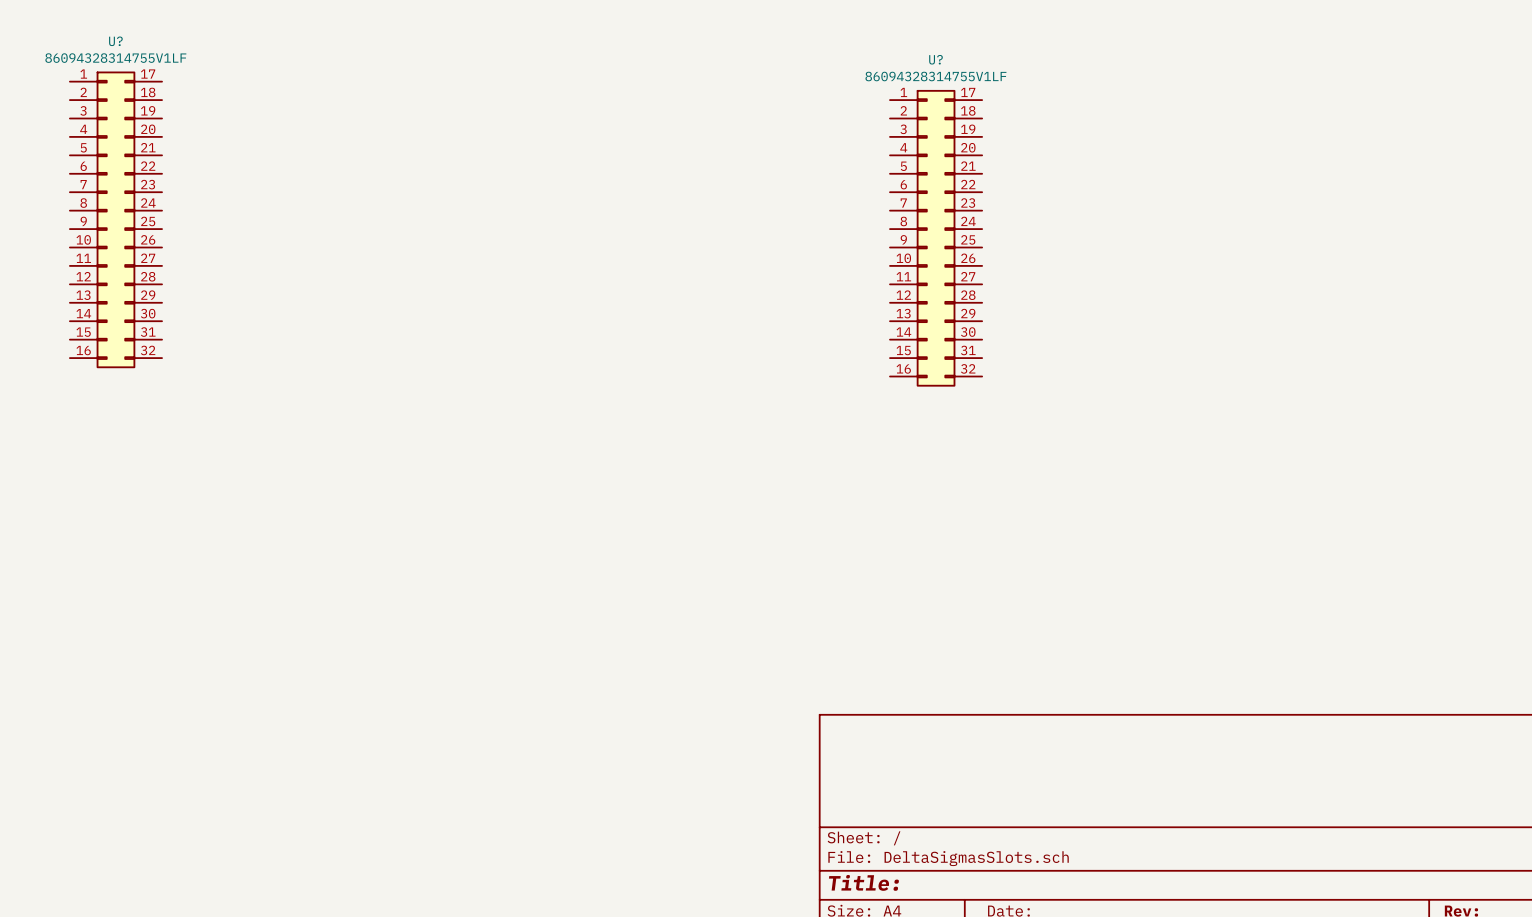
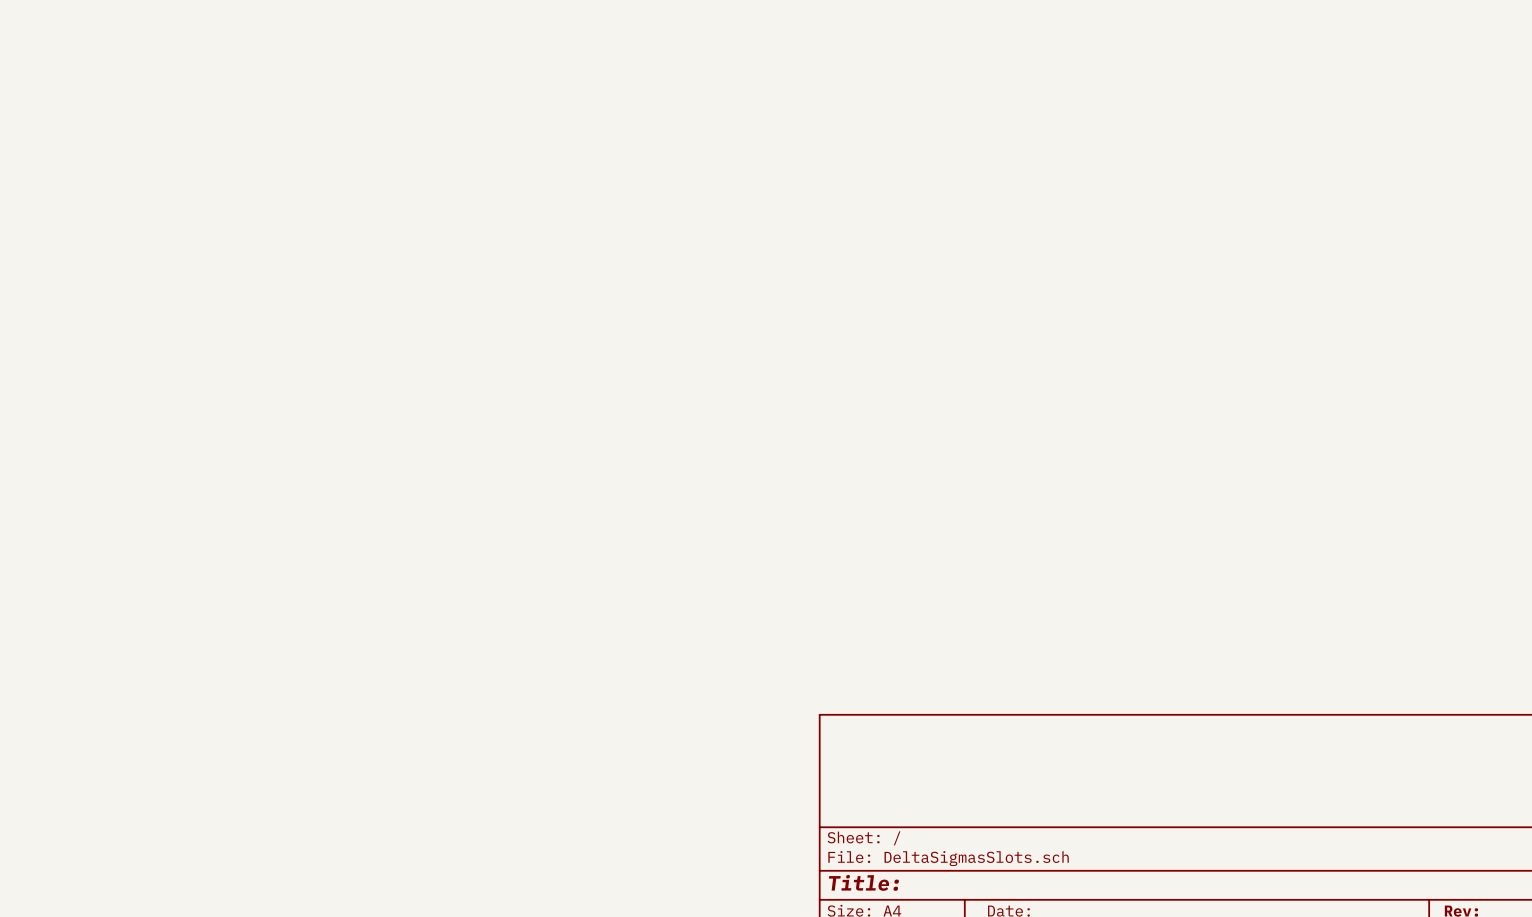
U?: 86094328314755V1LF (115, 219) -> none
U?: 86094328314755V1LF (936, 238) -> none

